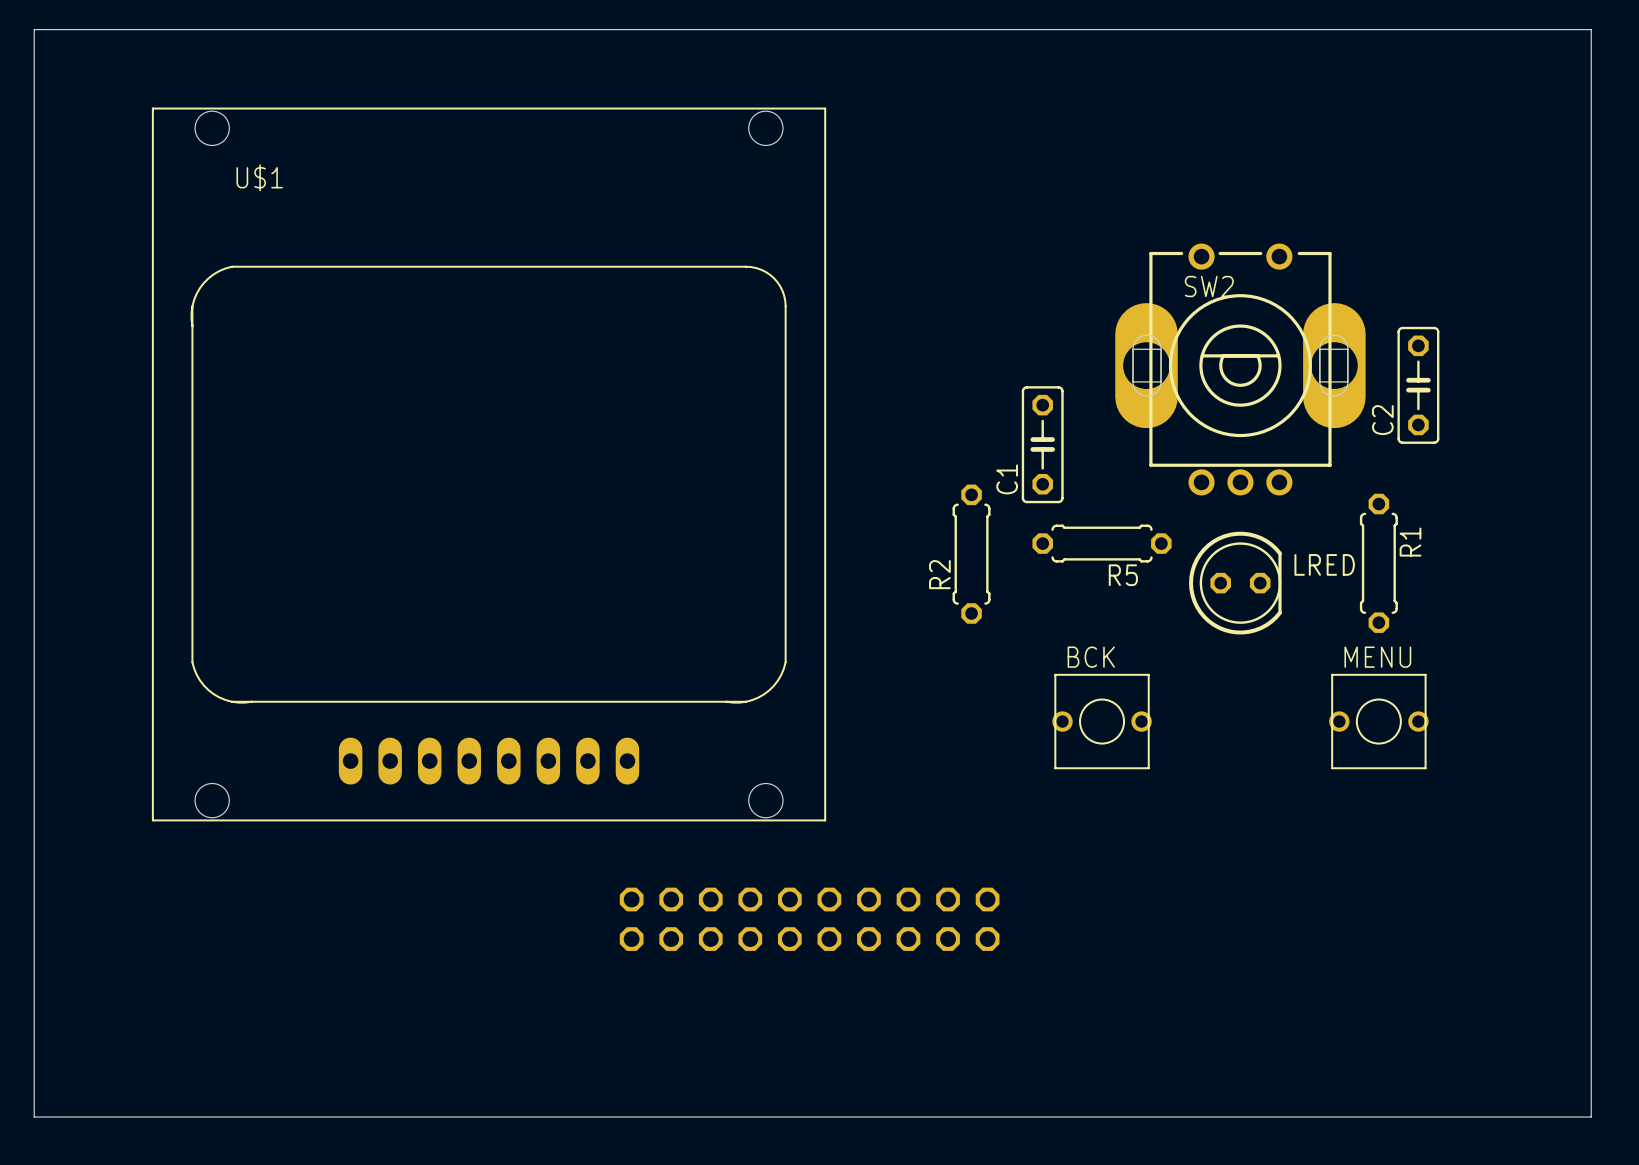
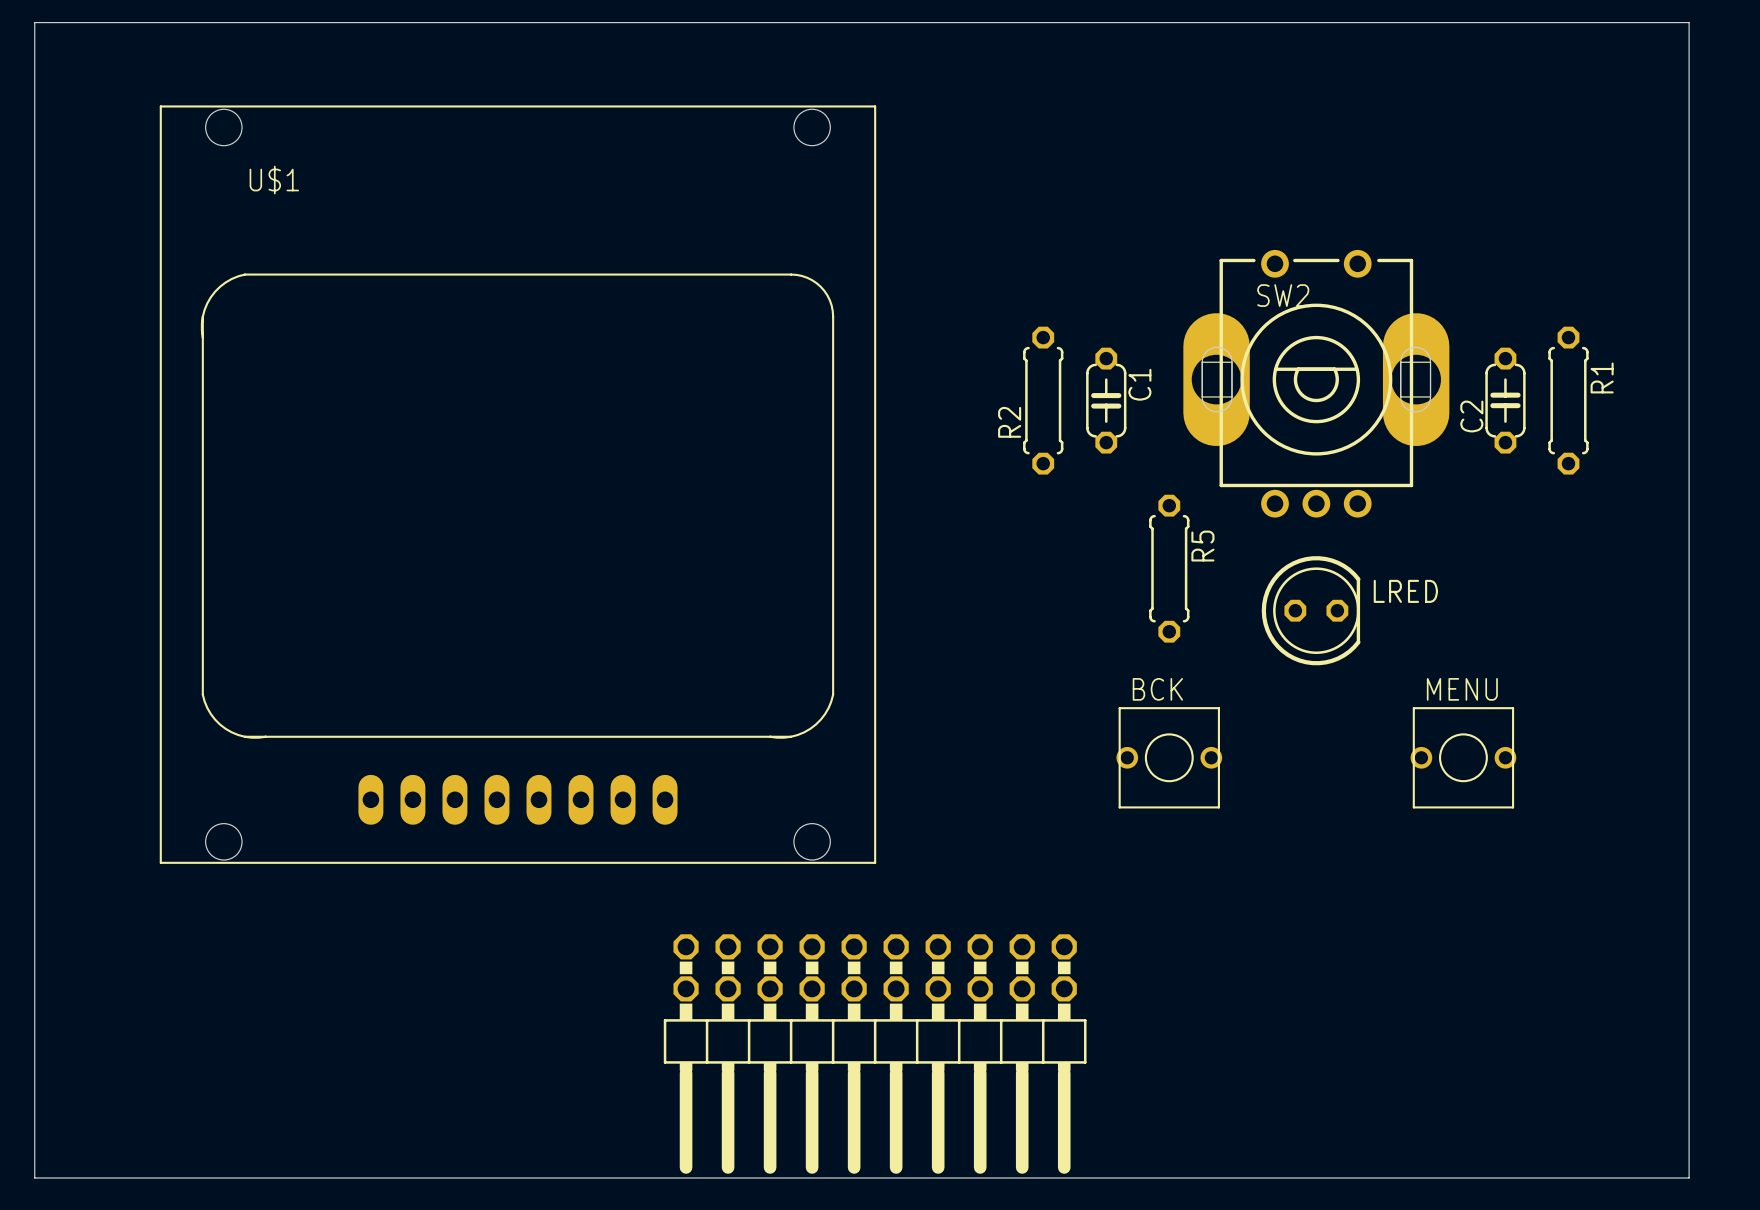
C2 footprint: [1397, 326, 1440, 444] -> [1485, 347, 1526, 454]
C1 footprint: [1021, 386, 1064, 504] -> [1086, 347, 1127, 454]
C1 name position: C1 (1007, 479) -> C1 (1139, 384)
R5 rotation: 0° (1102, 543) -> 90° clockwise (1169, 568)
R2 position: (971, 554) -> (1043, 400)
R1 position: (1378, 563) -> (1568, 400)
R5 name position: R5 (1123, 575) -> R5 (1202, 546)
part side: bottom (809, 919) -> top (875, 1054)

